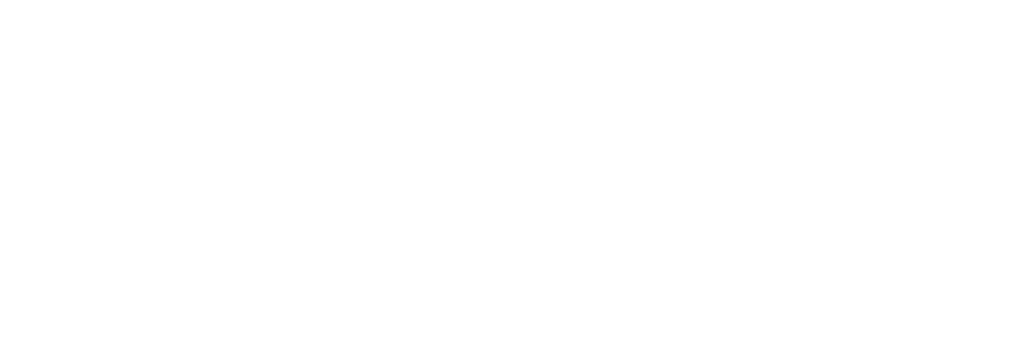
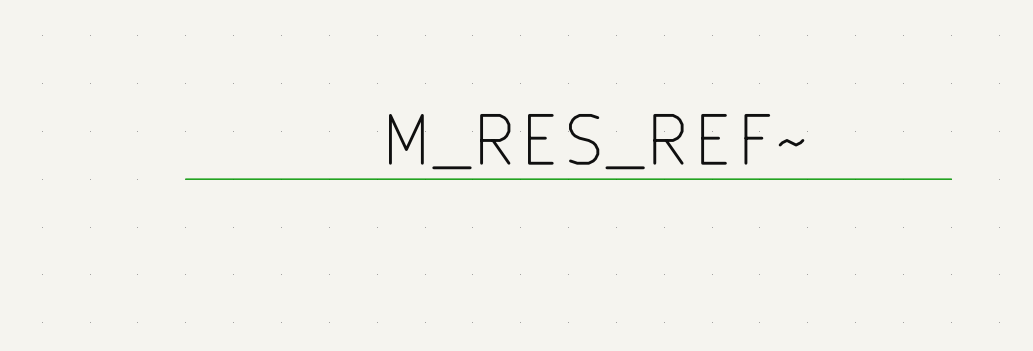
label: none -> M_RES_REF~ (596, 141)
wire: none -> (185, 179) (951, 179)

